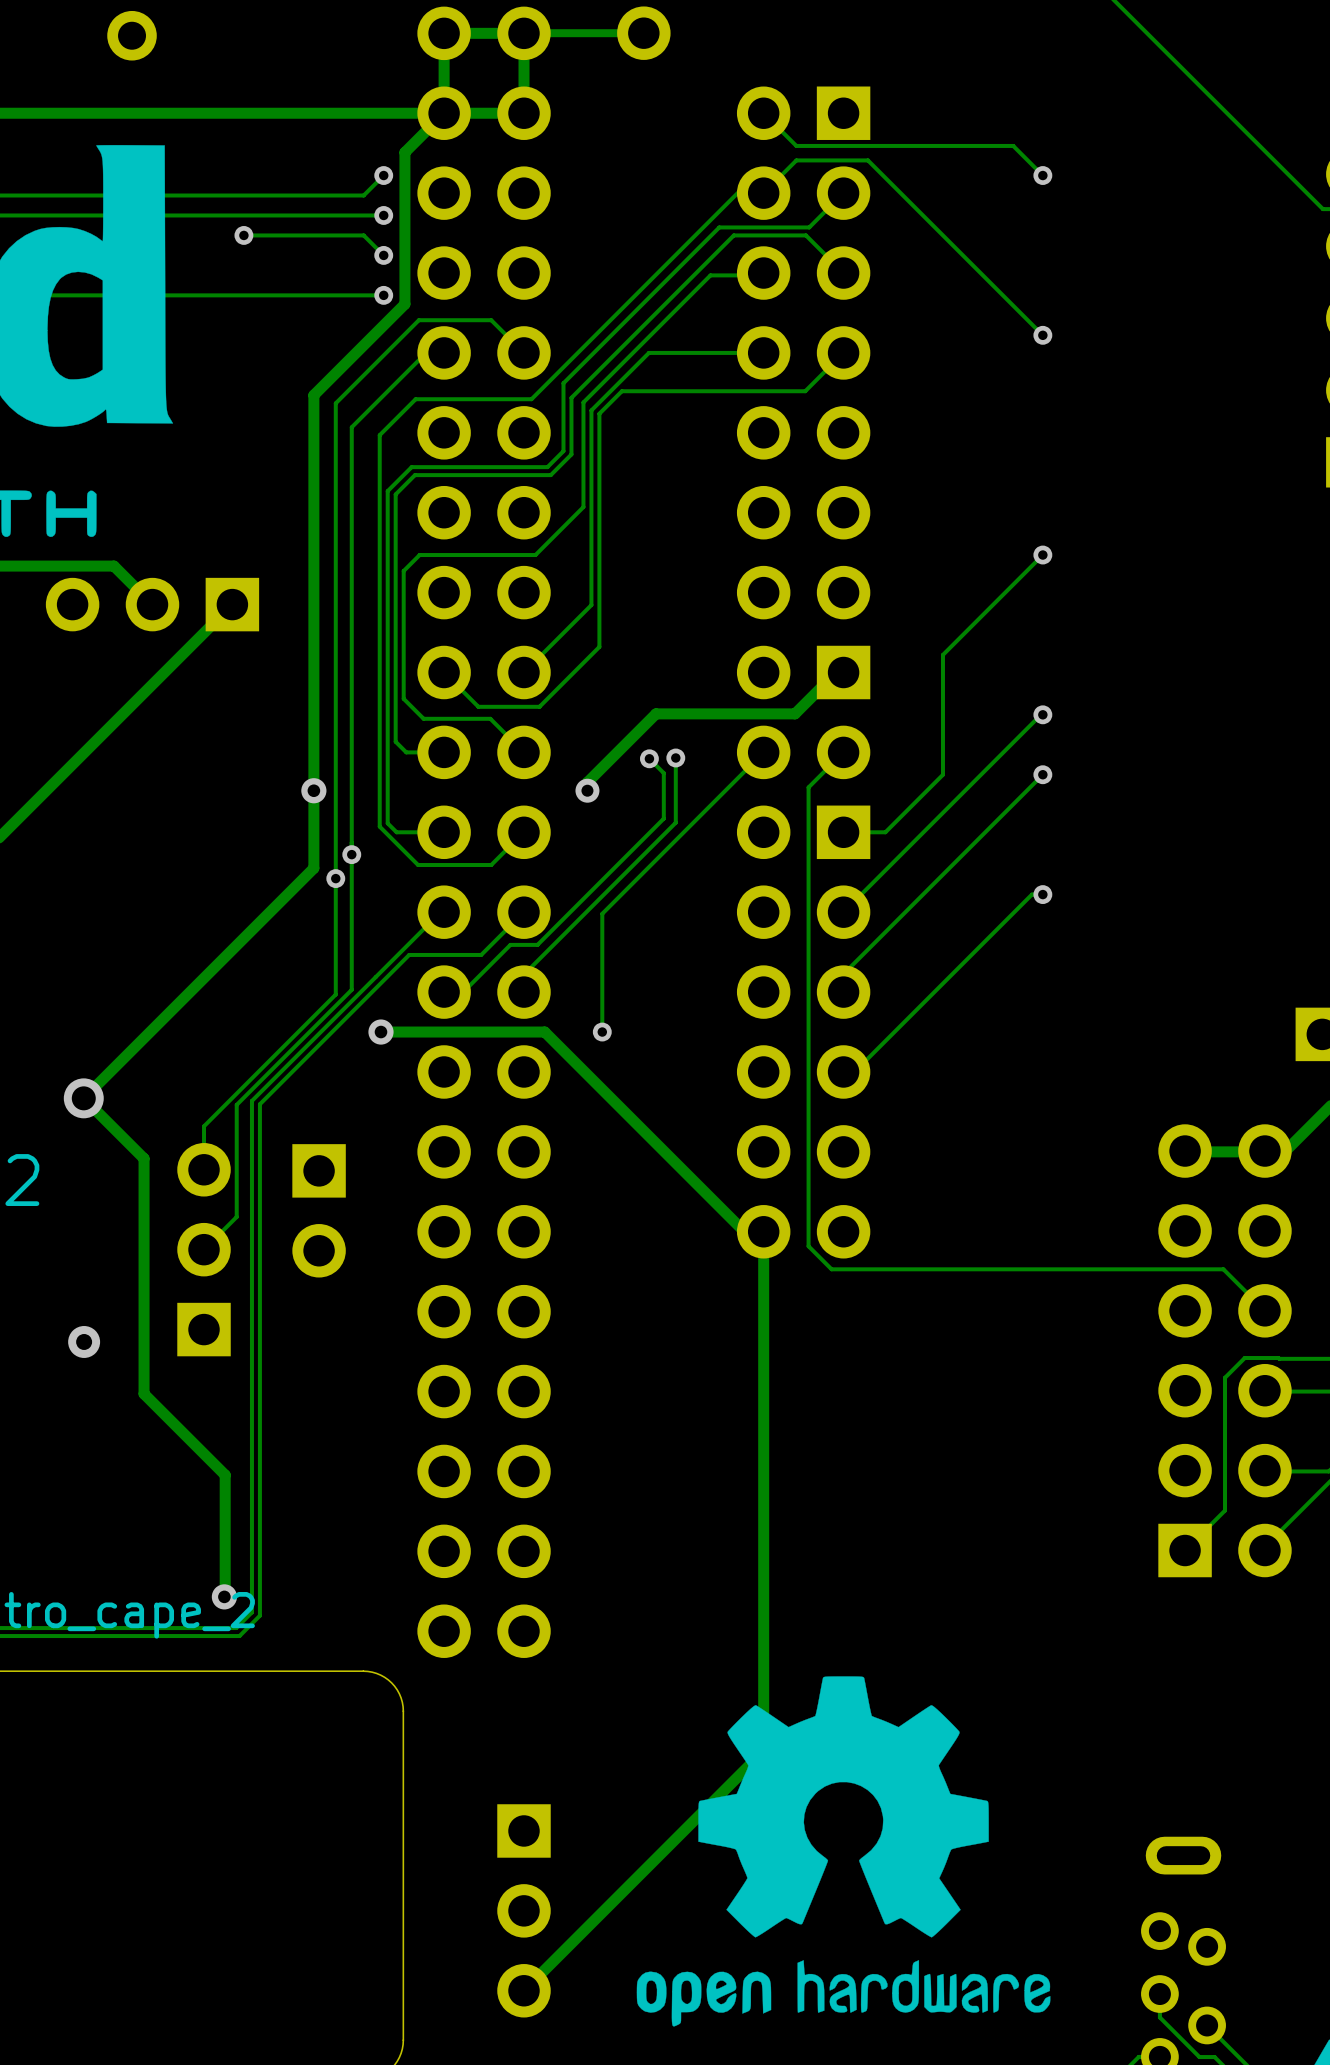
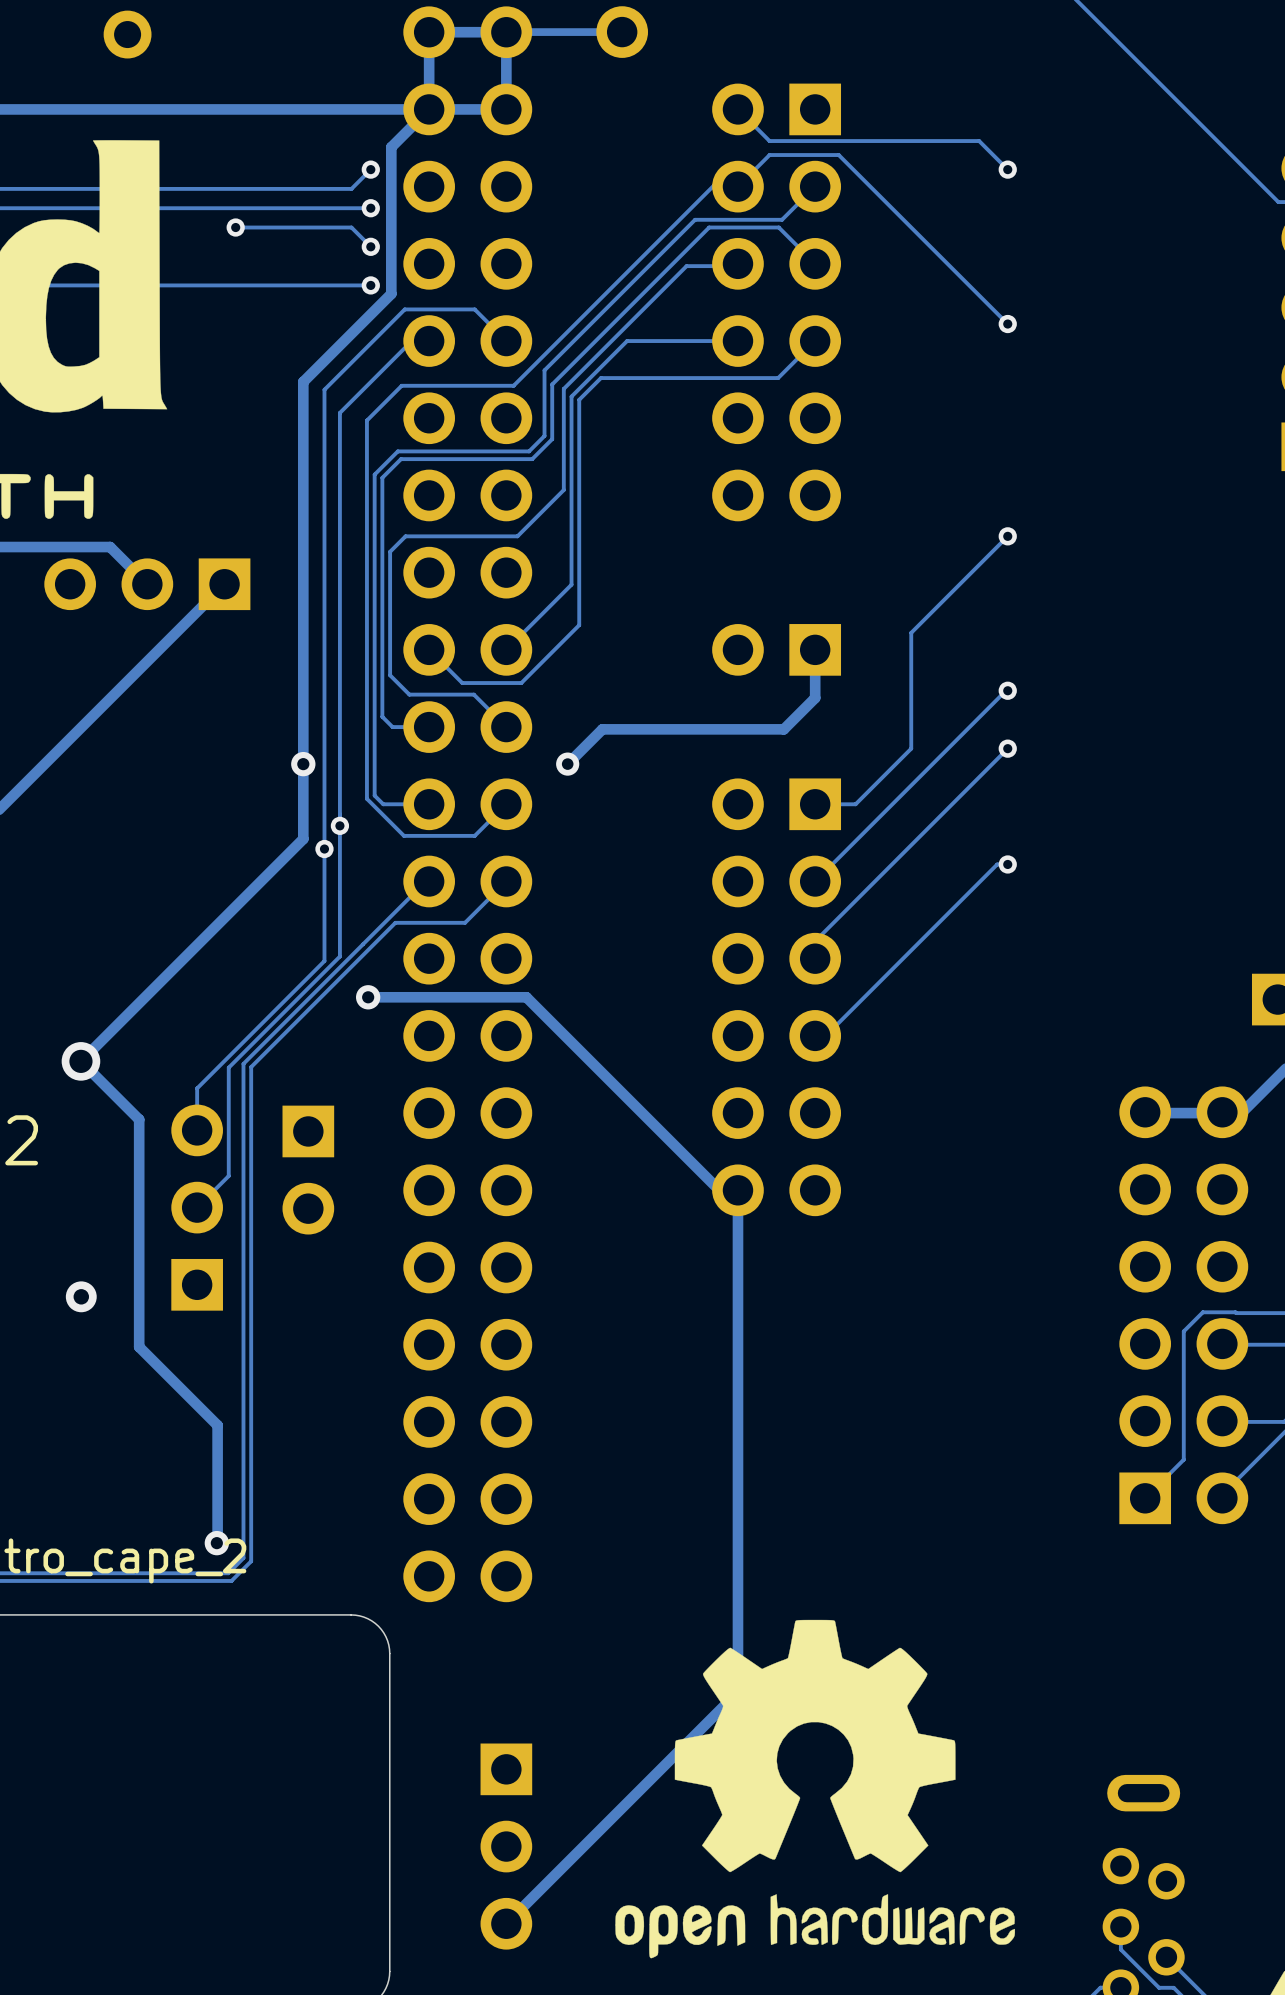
part: (803, 592) -> none
track: (843, 672) (836, 672) (795, 713) (655, 713) (587, 782) (587, 790) -> (815, 649) (815, 698) (783, 729) (602, 729) (567, 764)
track: (763, 752) (602, 913) (602, 1032) -> none
part: (803, 752) -> none
track: (843, 752) (808, 787) (808, 1246) (831, 1269) (1223, 1269) (1264, 1310) -> none
track: (675, 757) (675, 822) (524, 974) (524, 992) -> none
via: (675, 757) -> none
track: (649, 758) (663, 773) (663, 818) (537, 944) (510, 944) (463, 992) (444, 992) -> none
via: (649, 758) -> none
via: (602, 1032) -> none

